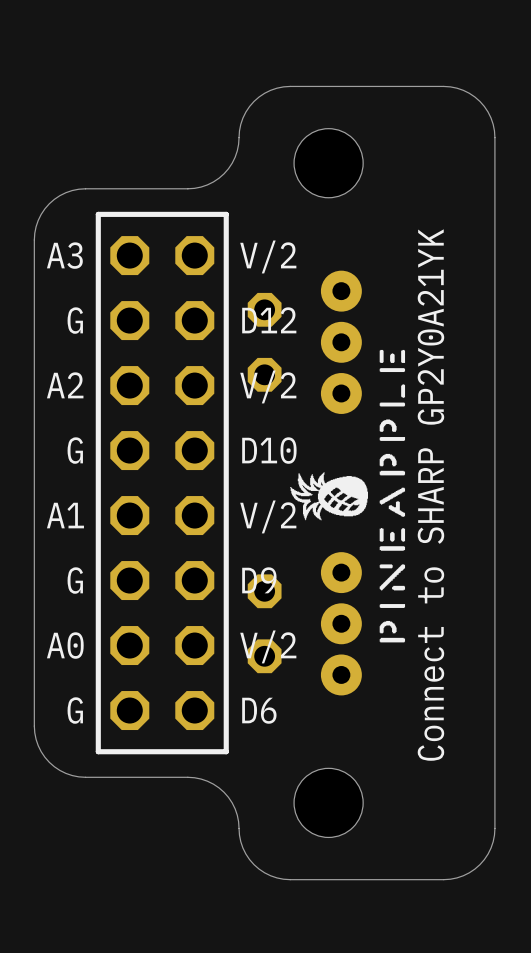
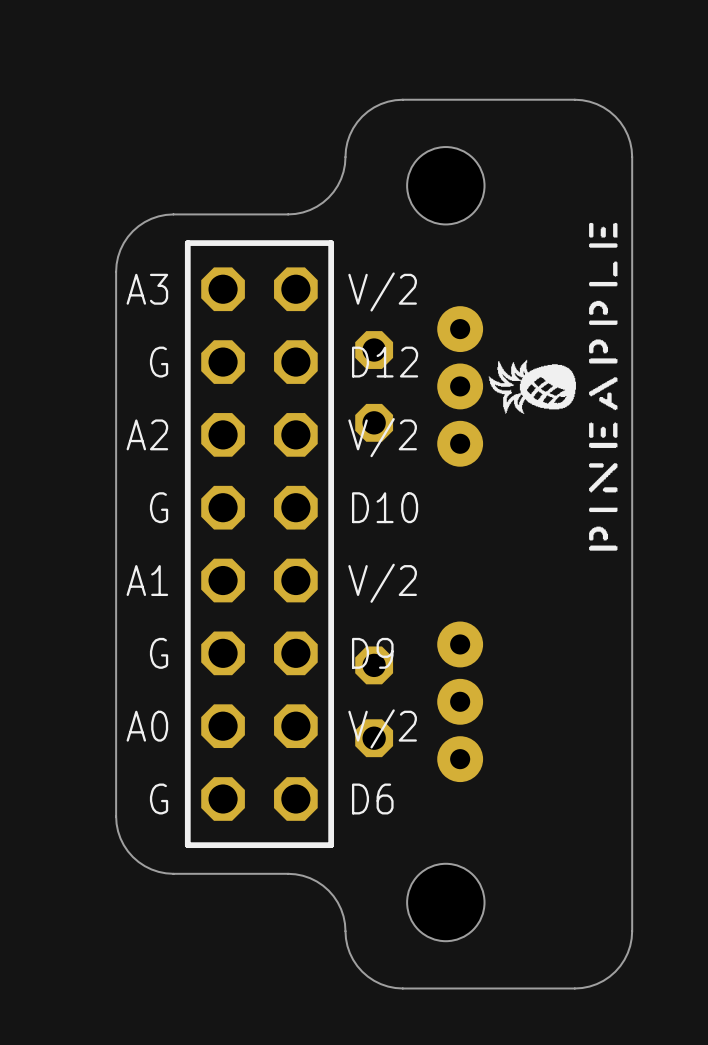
text: Connect to SHARP GP2Y0A21YK (430, 495) -> none
drawing position: (347, 496) -> (553, 386)

